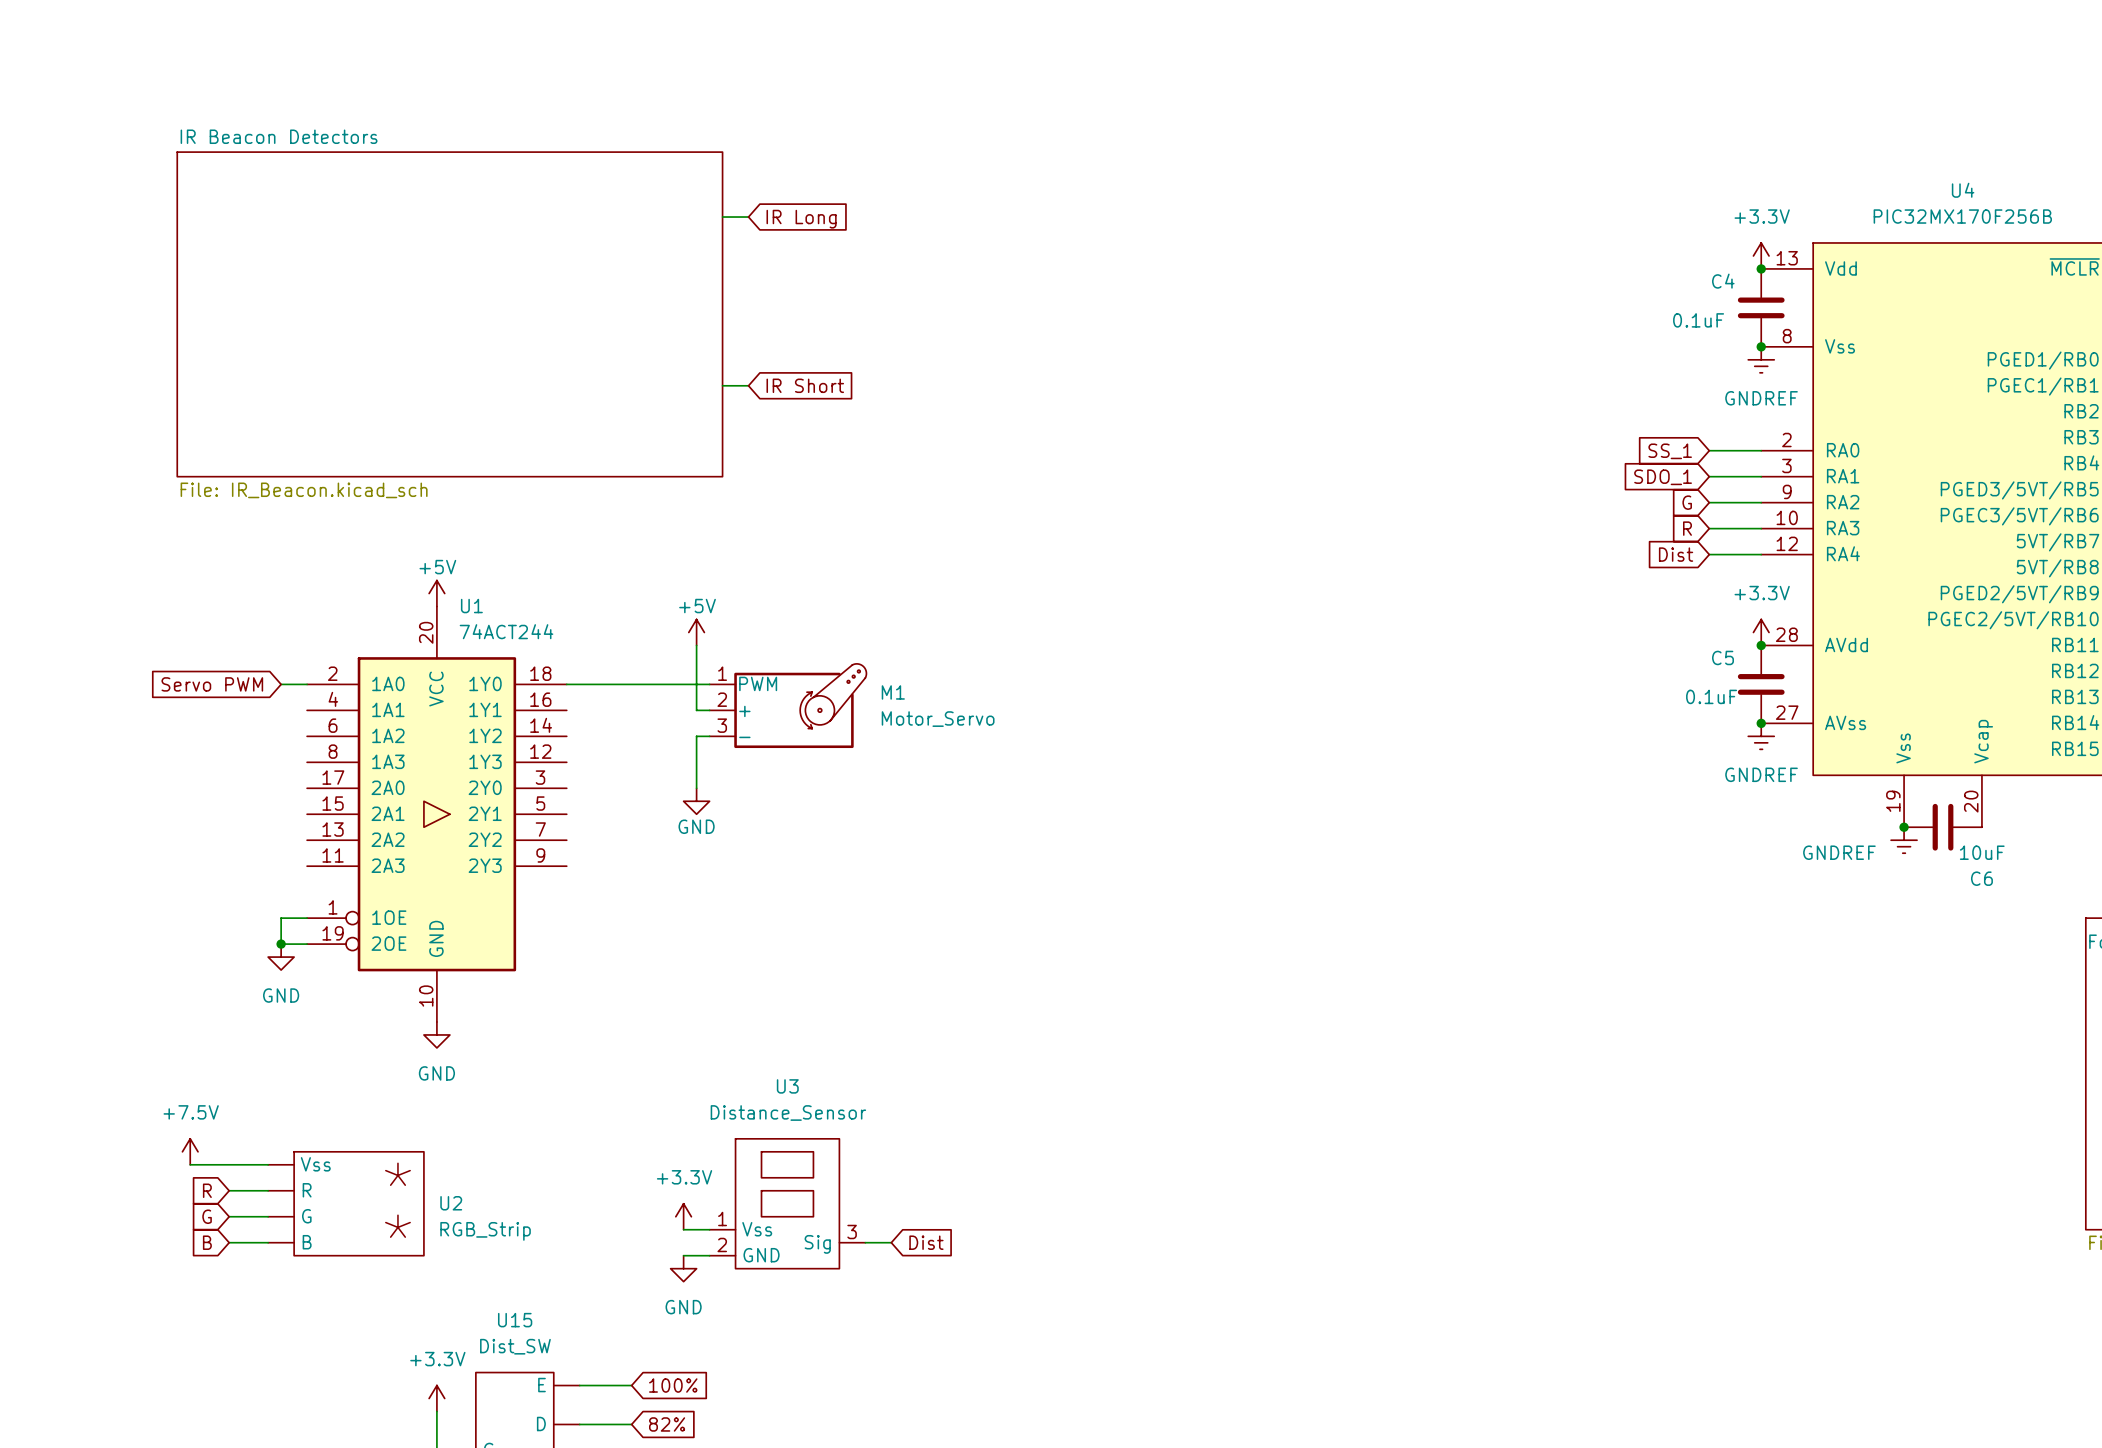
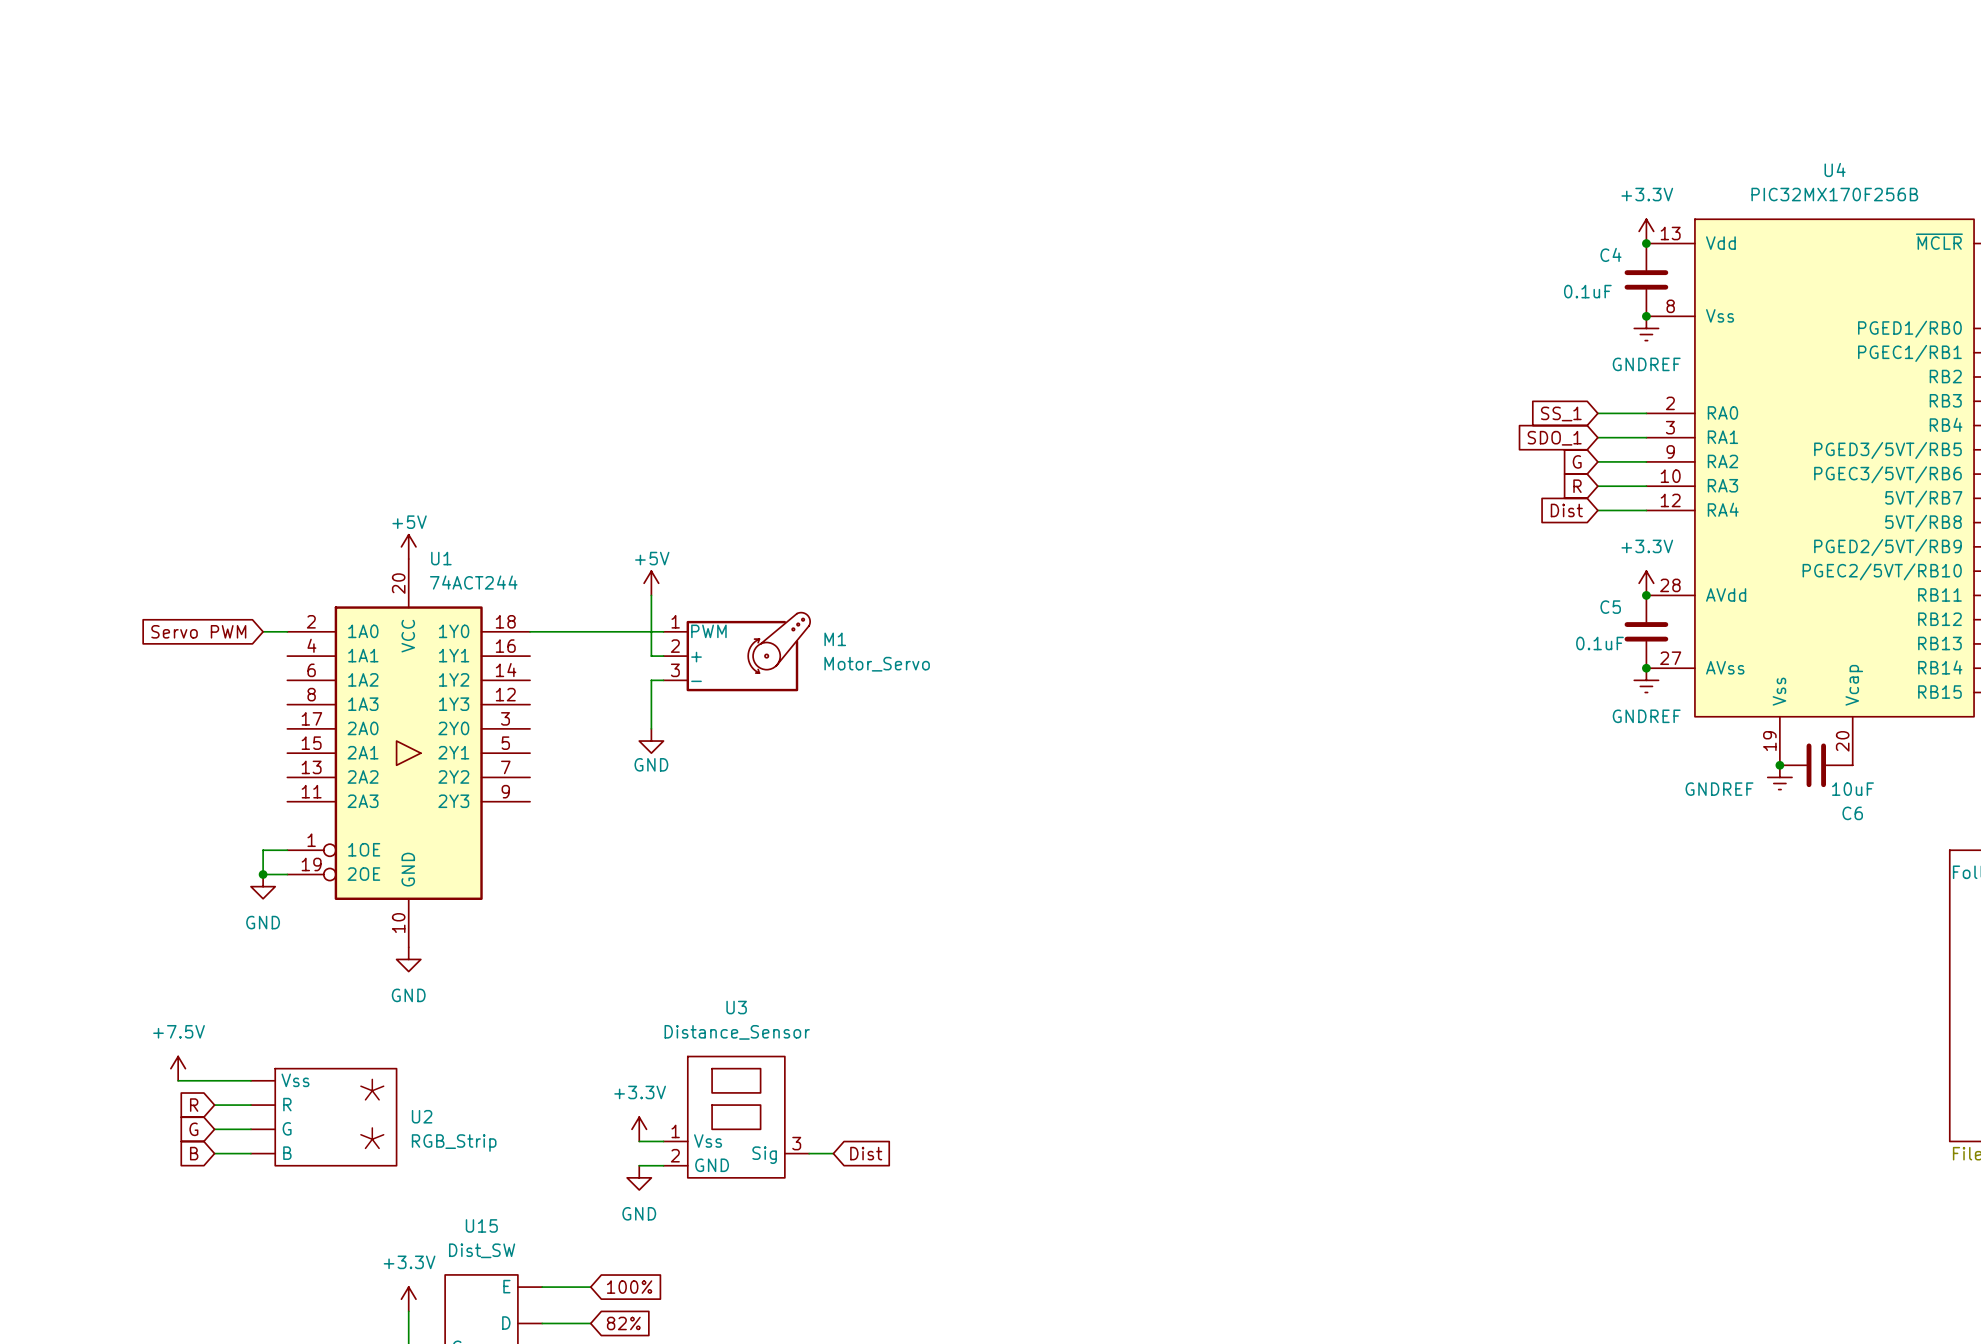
wire: (722, 217) (748, 217) -> none
global label: IR Long (801, 219) -> none
sheet IR Beacon Detectors: File: IR_Beacon.kicad_sch (449, 314) -> none
wire: (722, 385) (748, 385) -> none
global label: IR Short (805, 385) -> none

